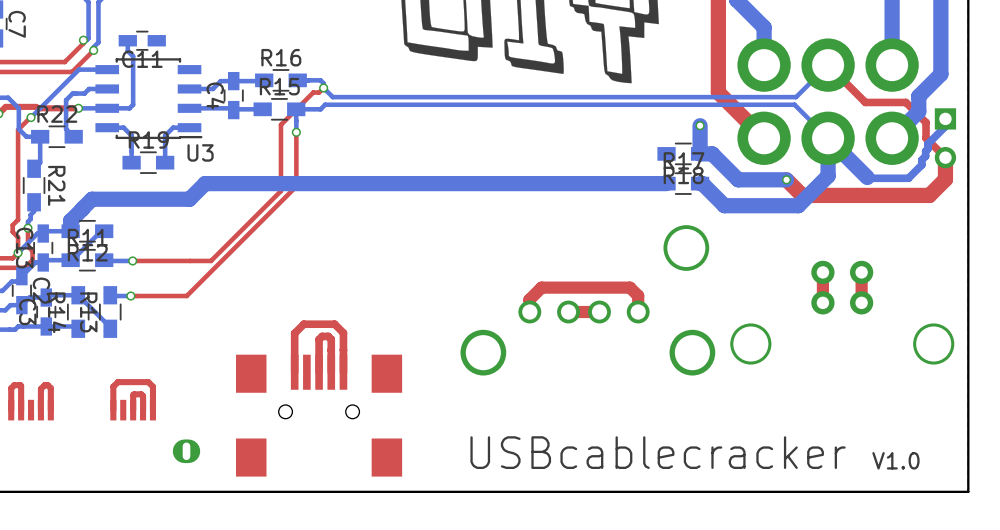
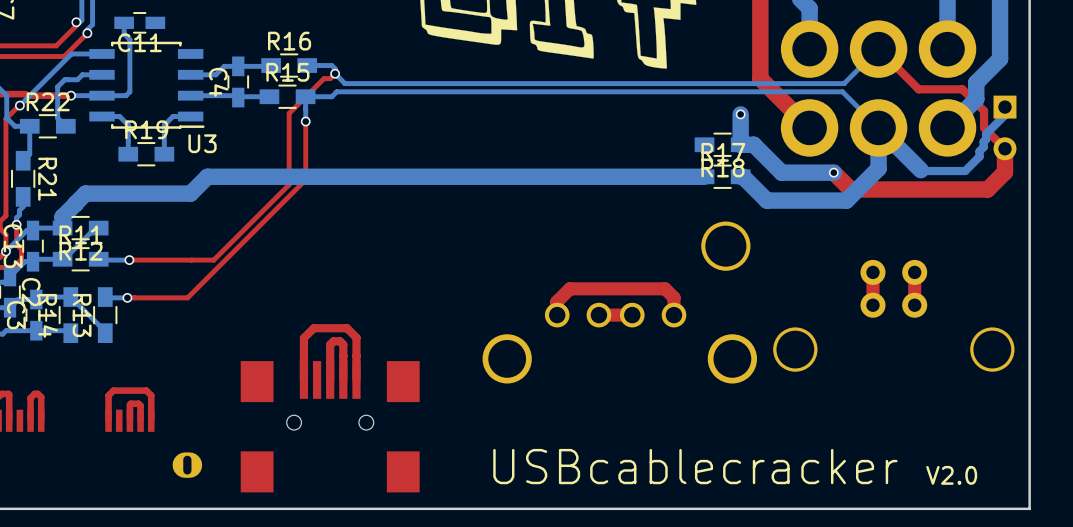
text: V1.0 (895, 460) -> V2.0 (951, 475)

